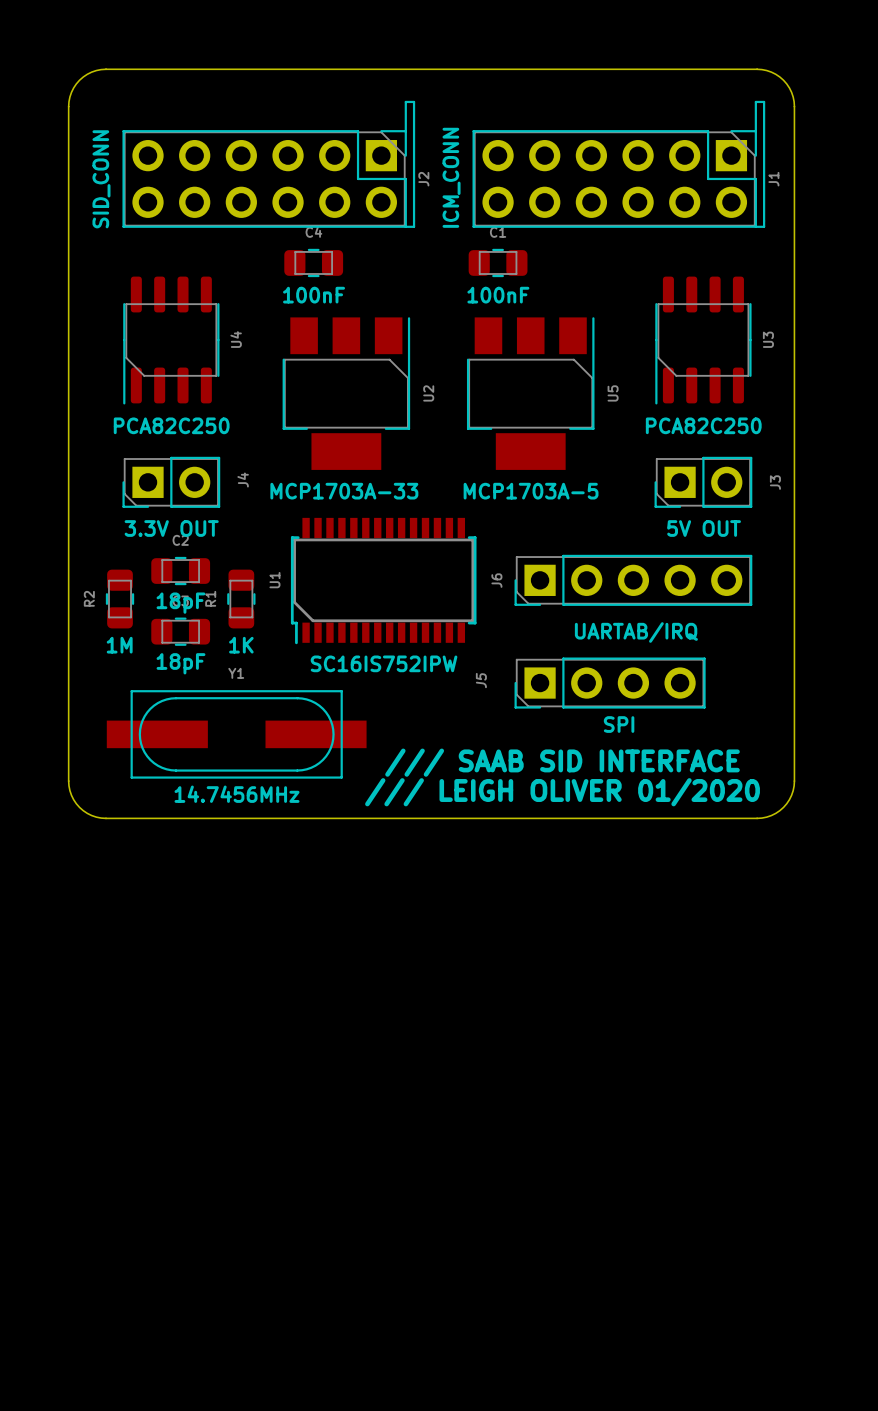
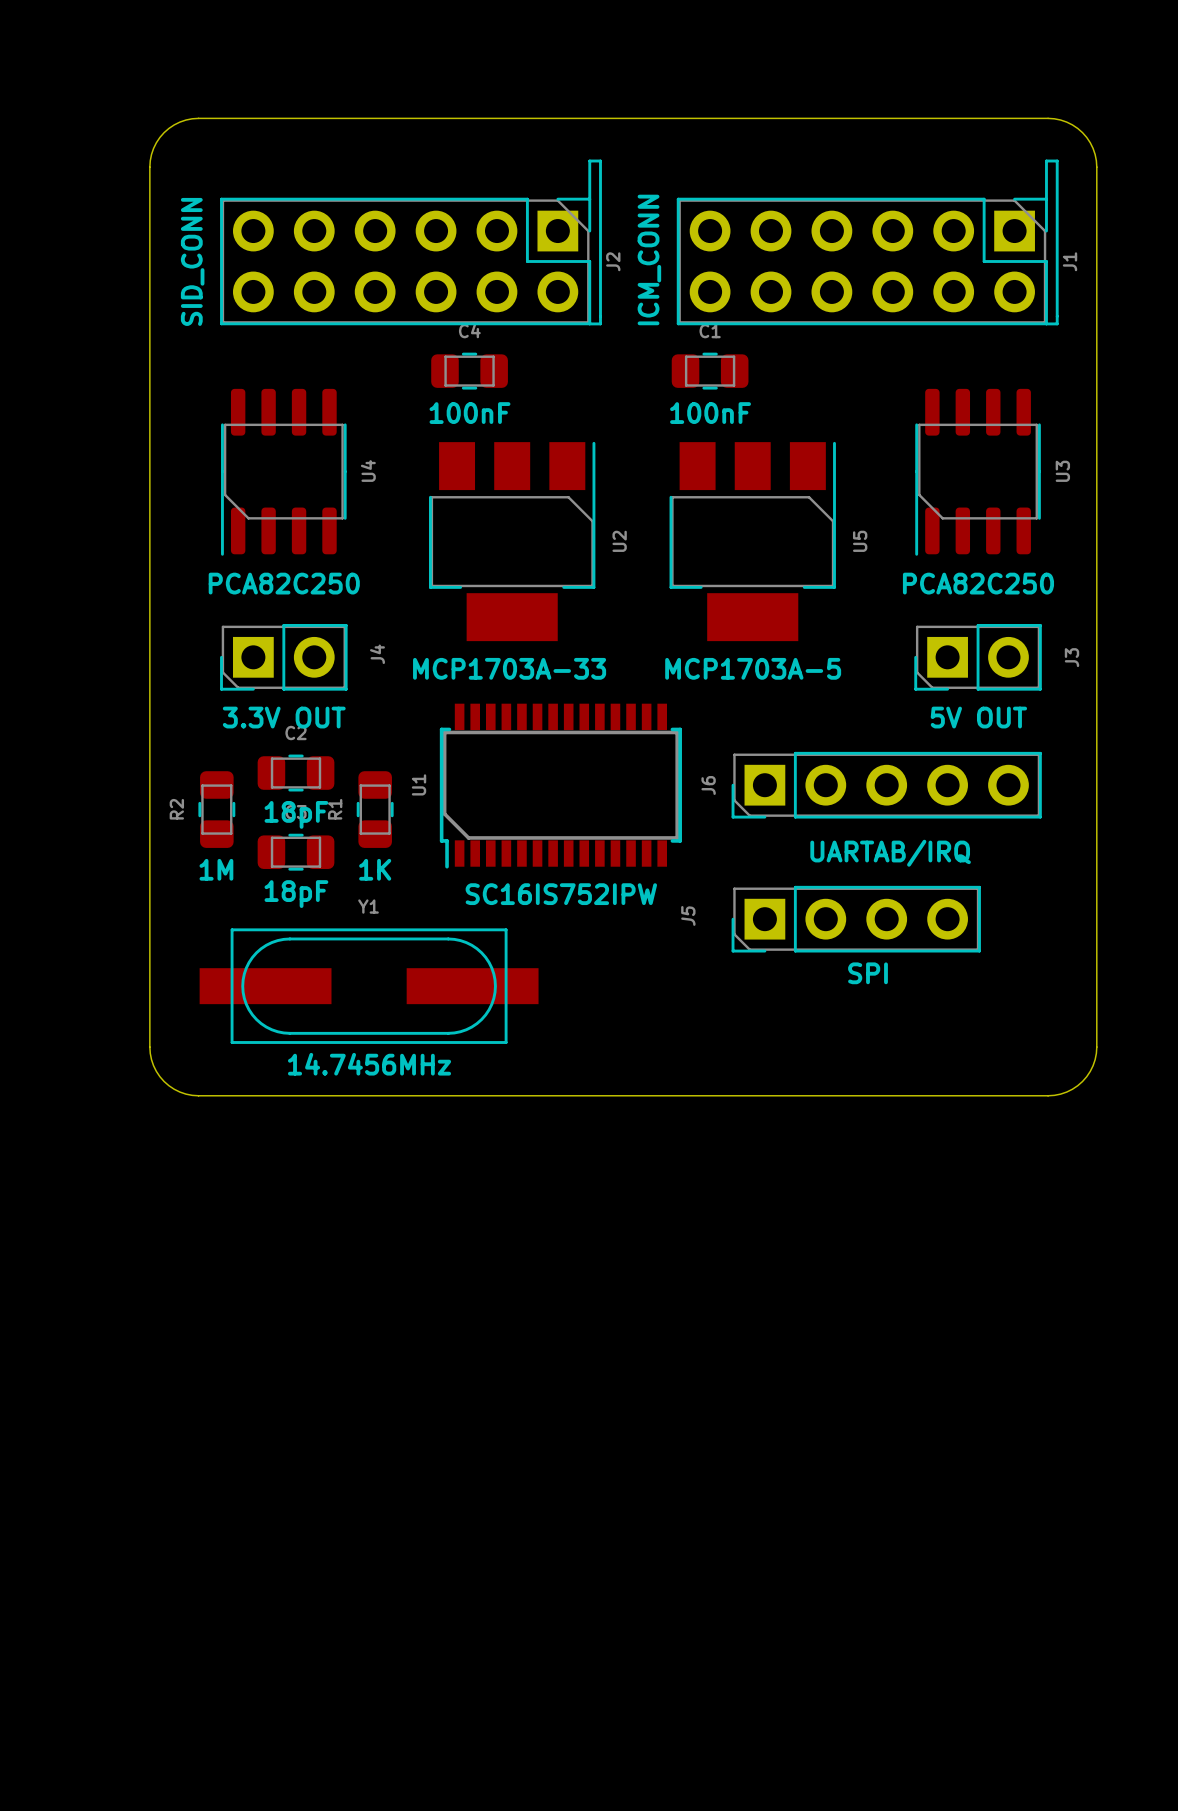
text: /// SAAB SID INTERFACE (562, 762) -> none
text: /// LEIGH OLIVER 01/2020 (562, 792) -> none

